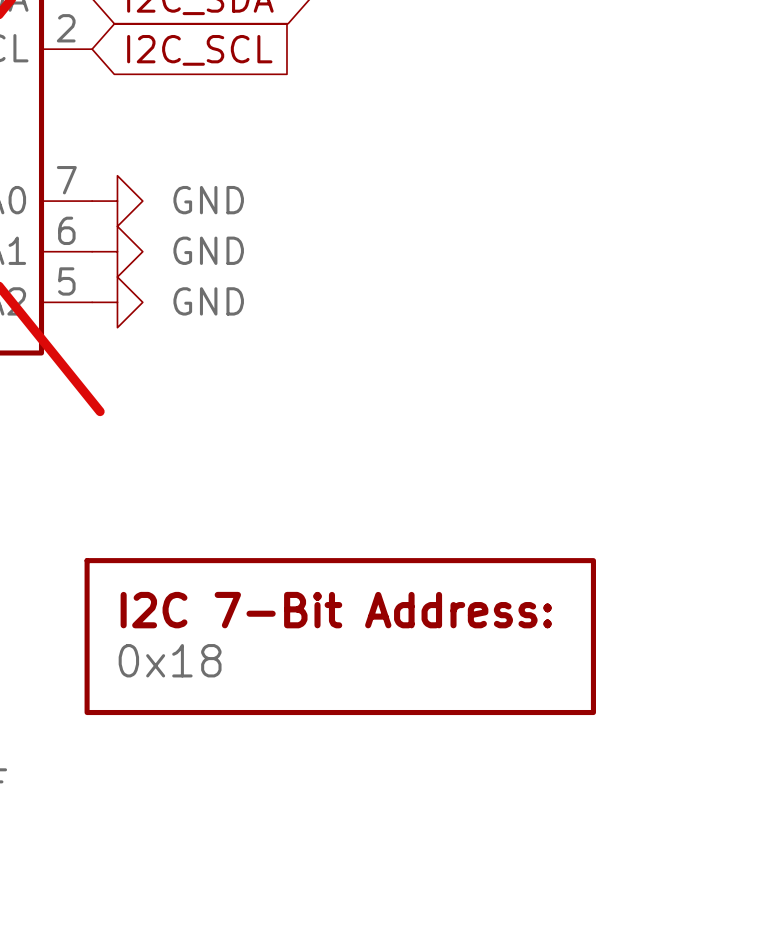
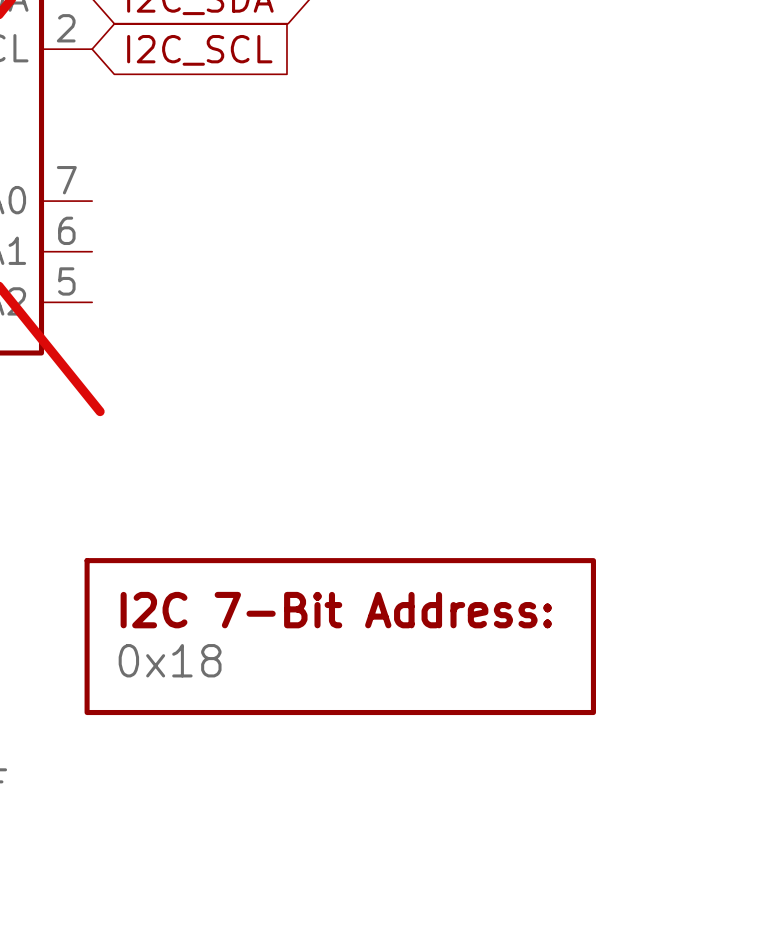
power symbol: GND (117, 201) -> none
power symbol: GND (117, 251) -> none
power symbol: GND (117, 302) -> none

